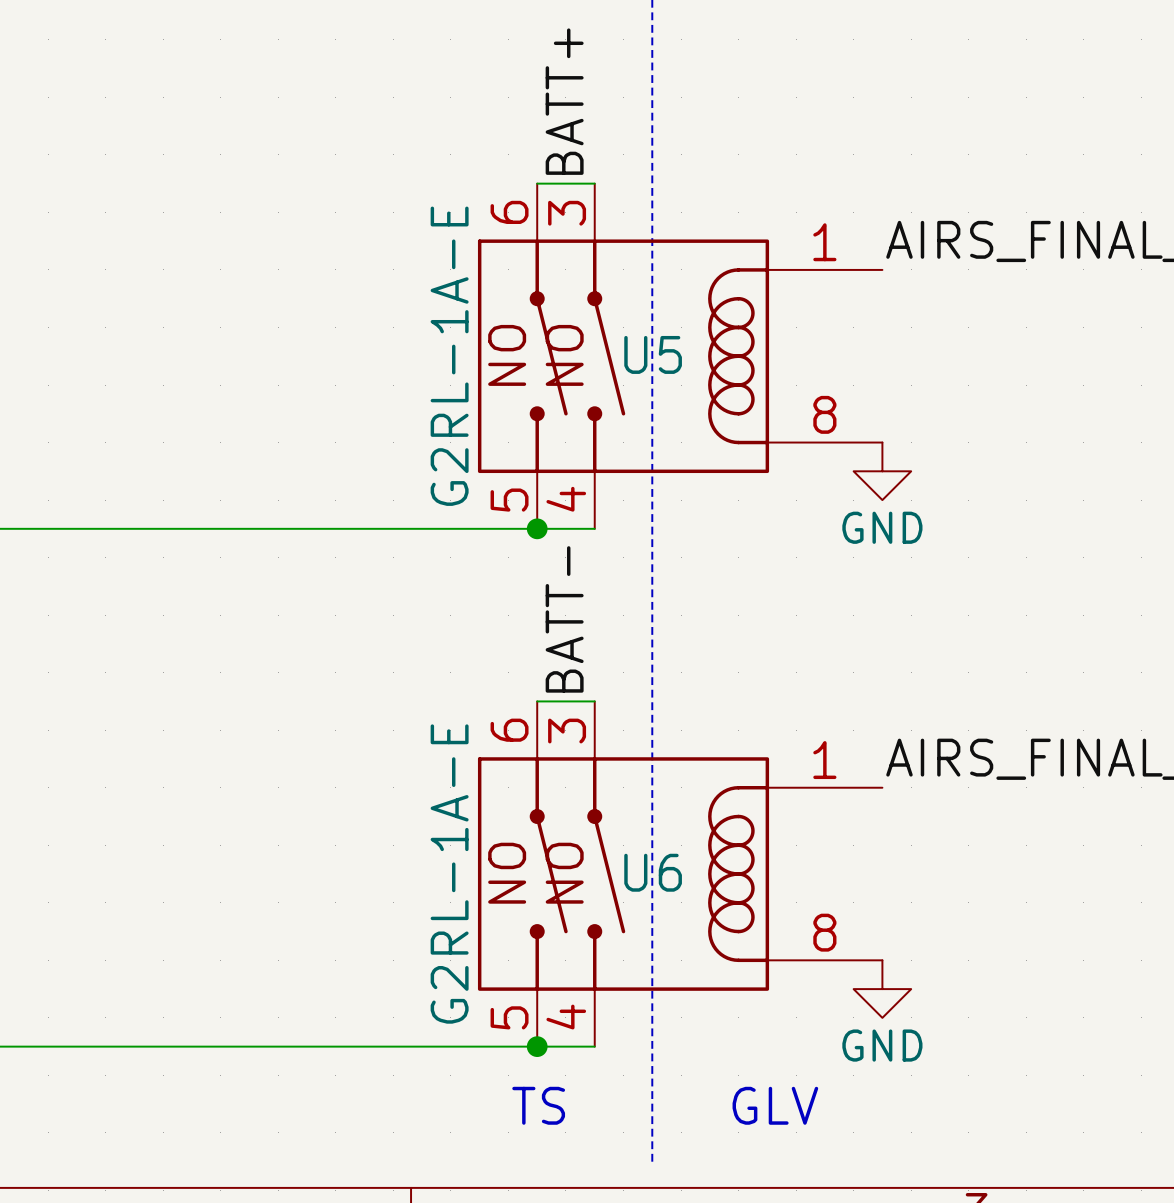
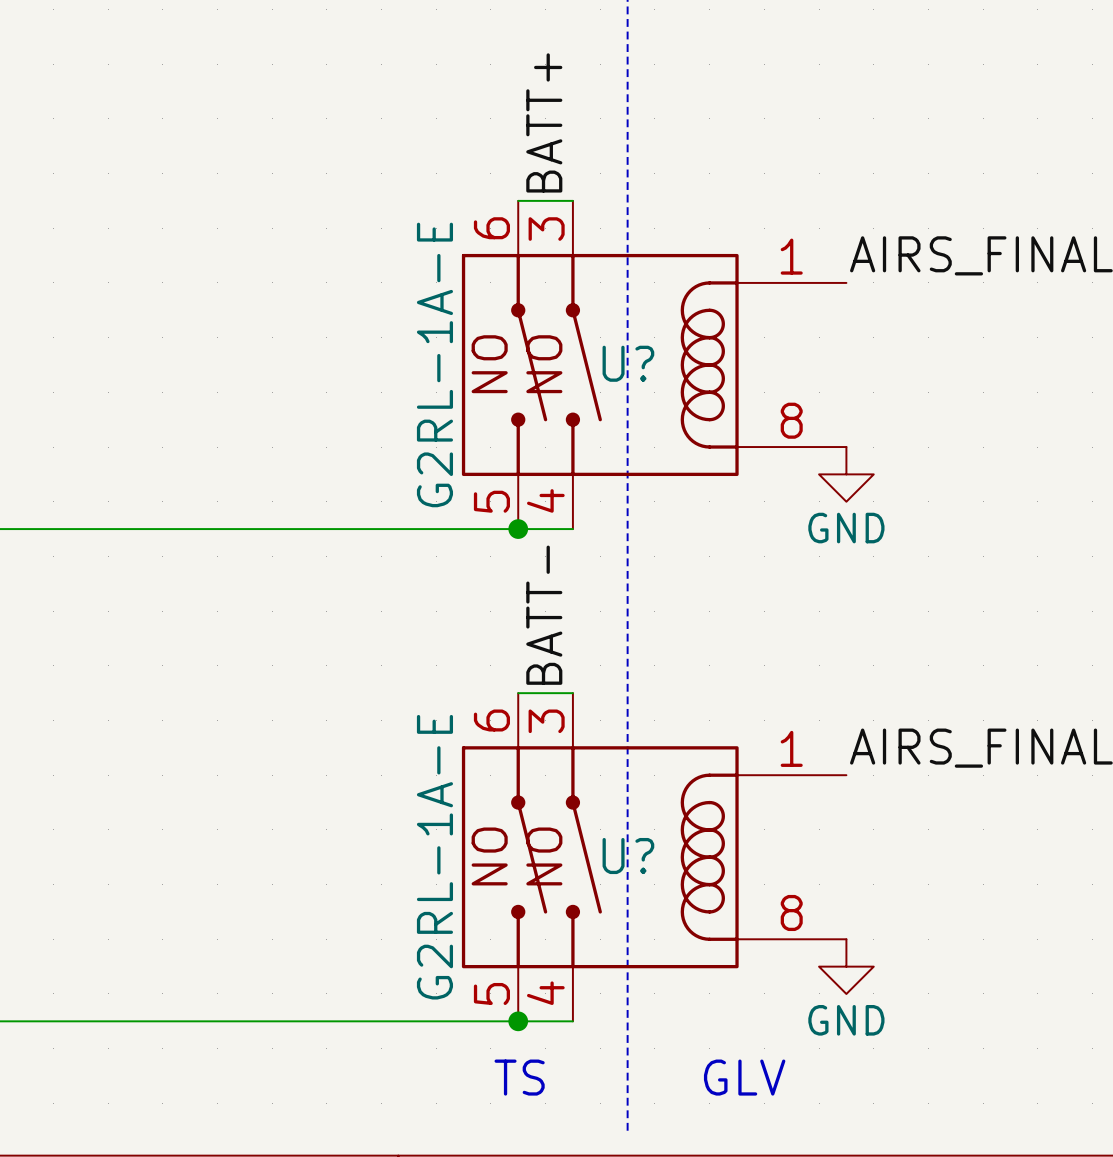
U5 name: U5 (653, 354) -> U? (628, 363)
U6 name: U6 (653, 872) -> U? (628, 856)

